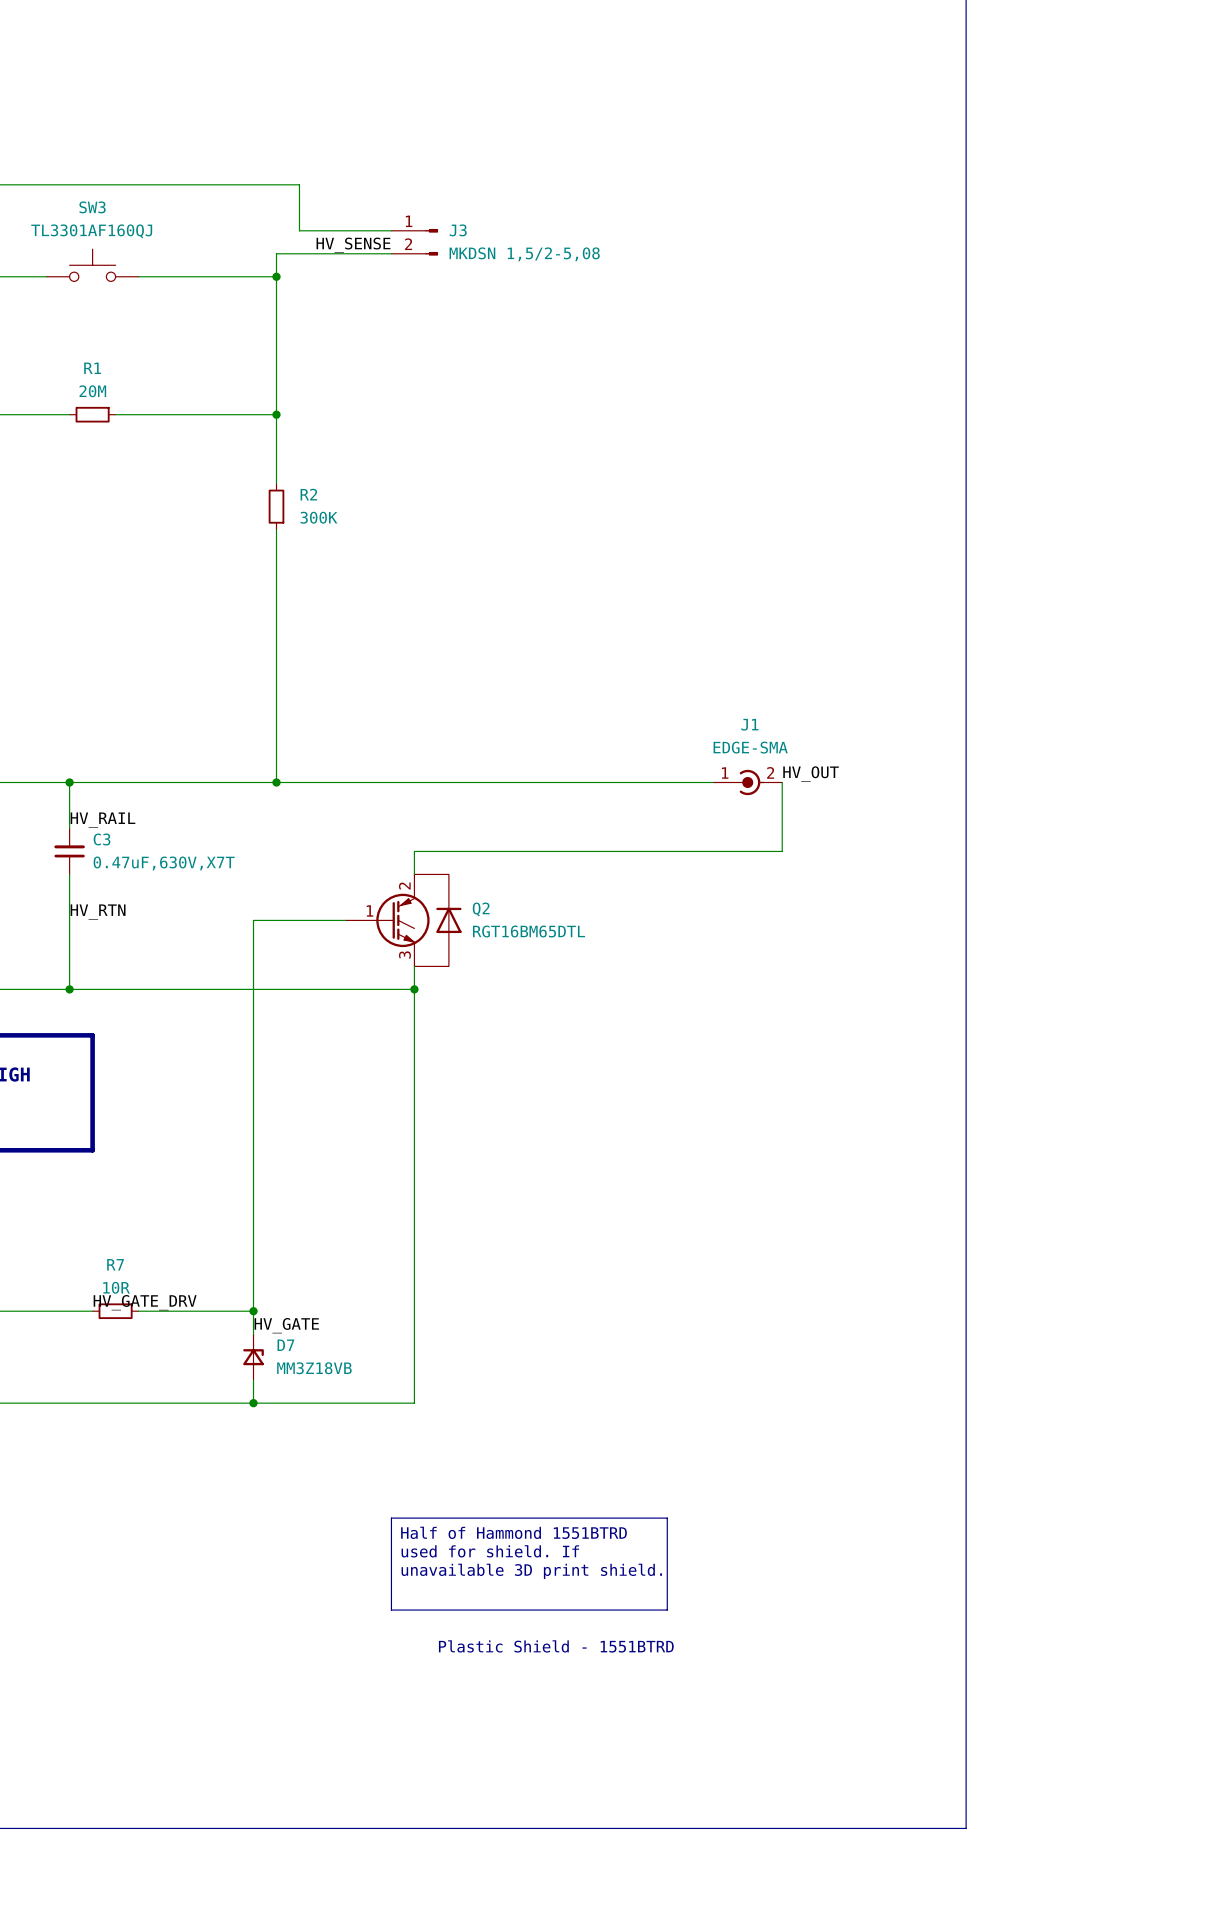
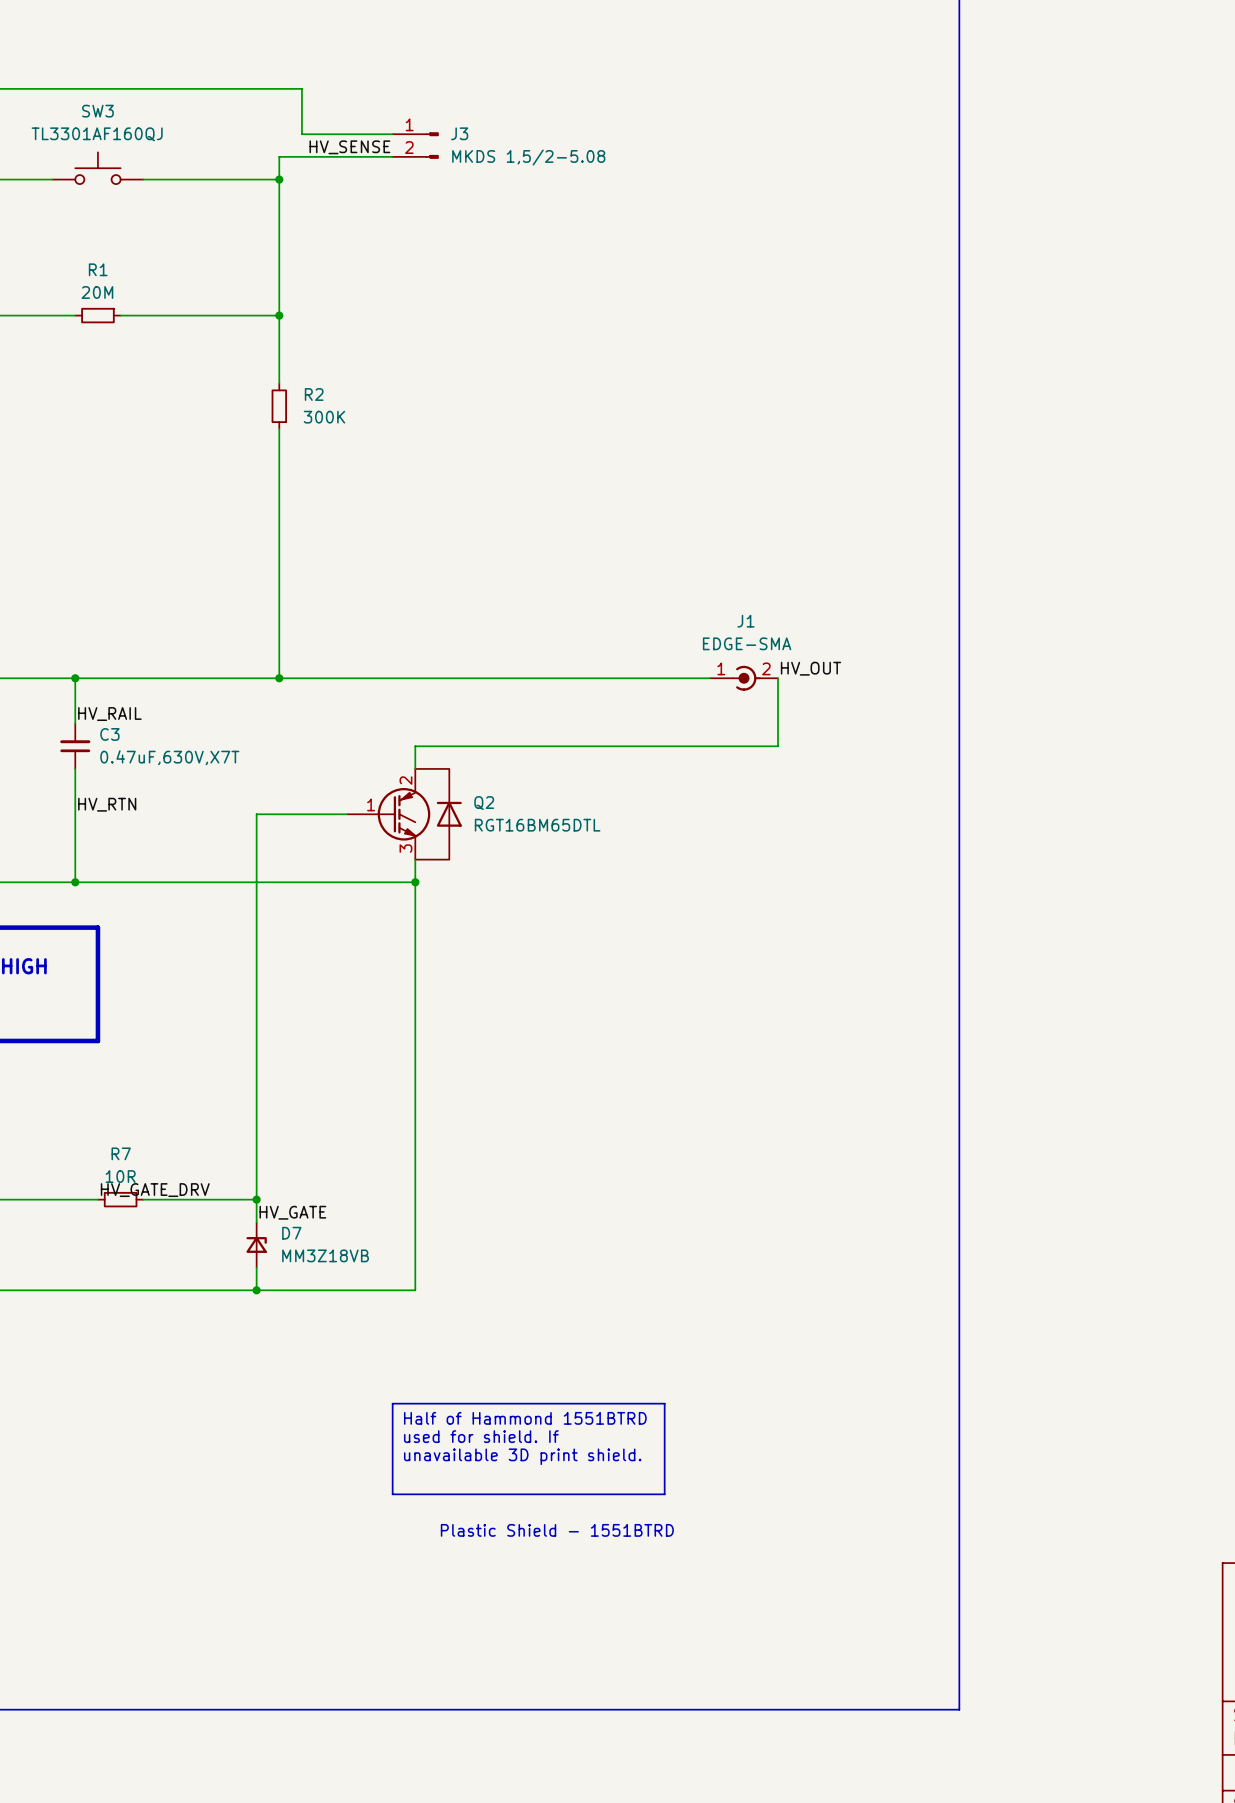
J3 value: MKDSN 1,5/2-5,08 (524, 254) -> MKDS 1,5/2-5.08 (528, 157)

